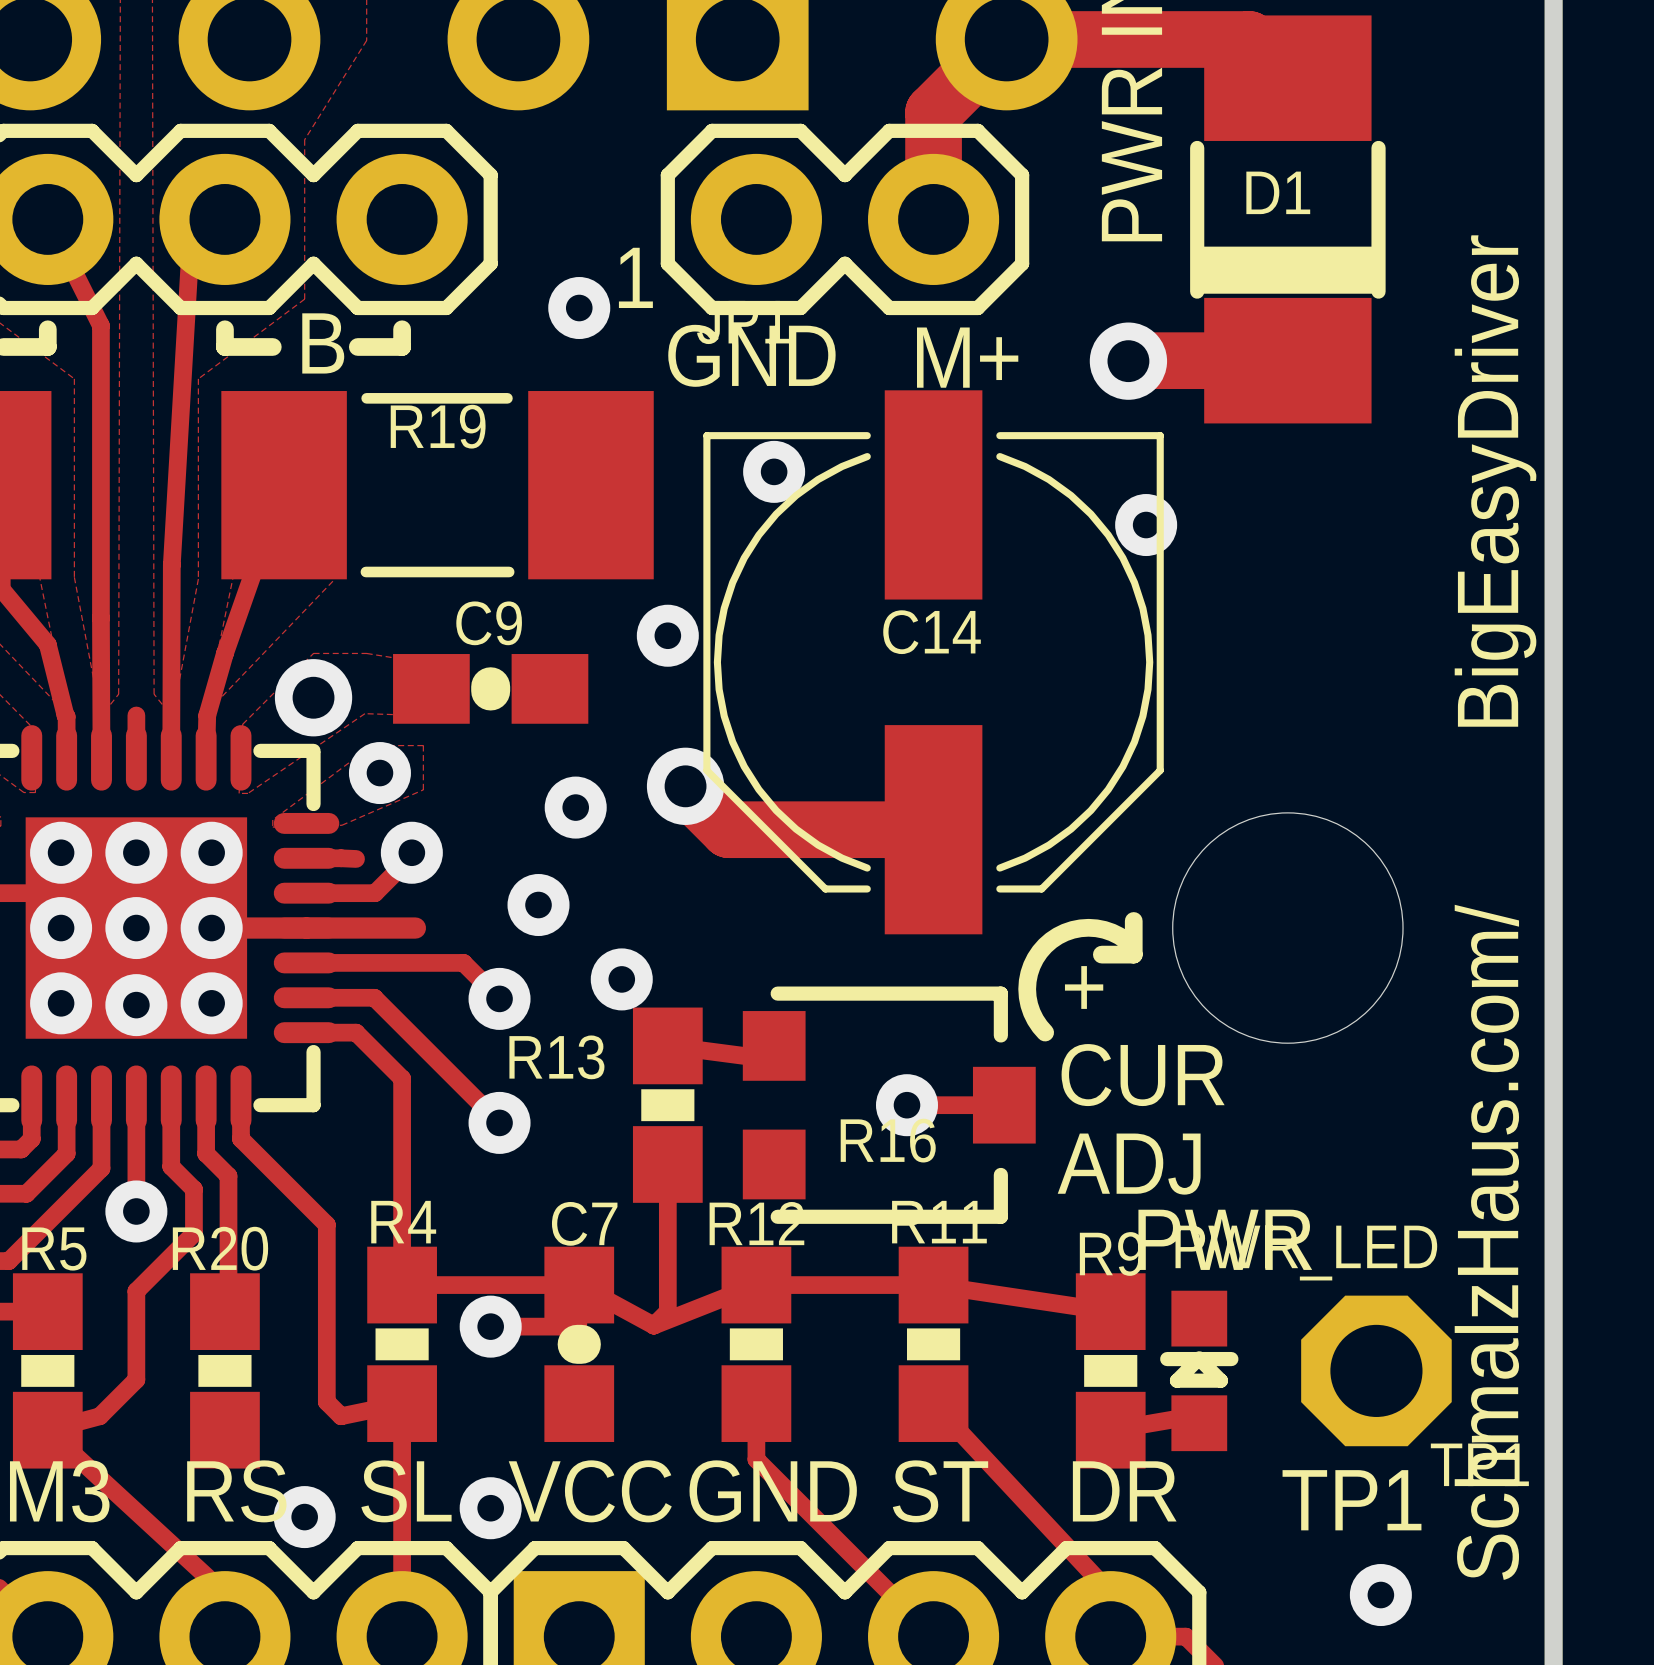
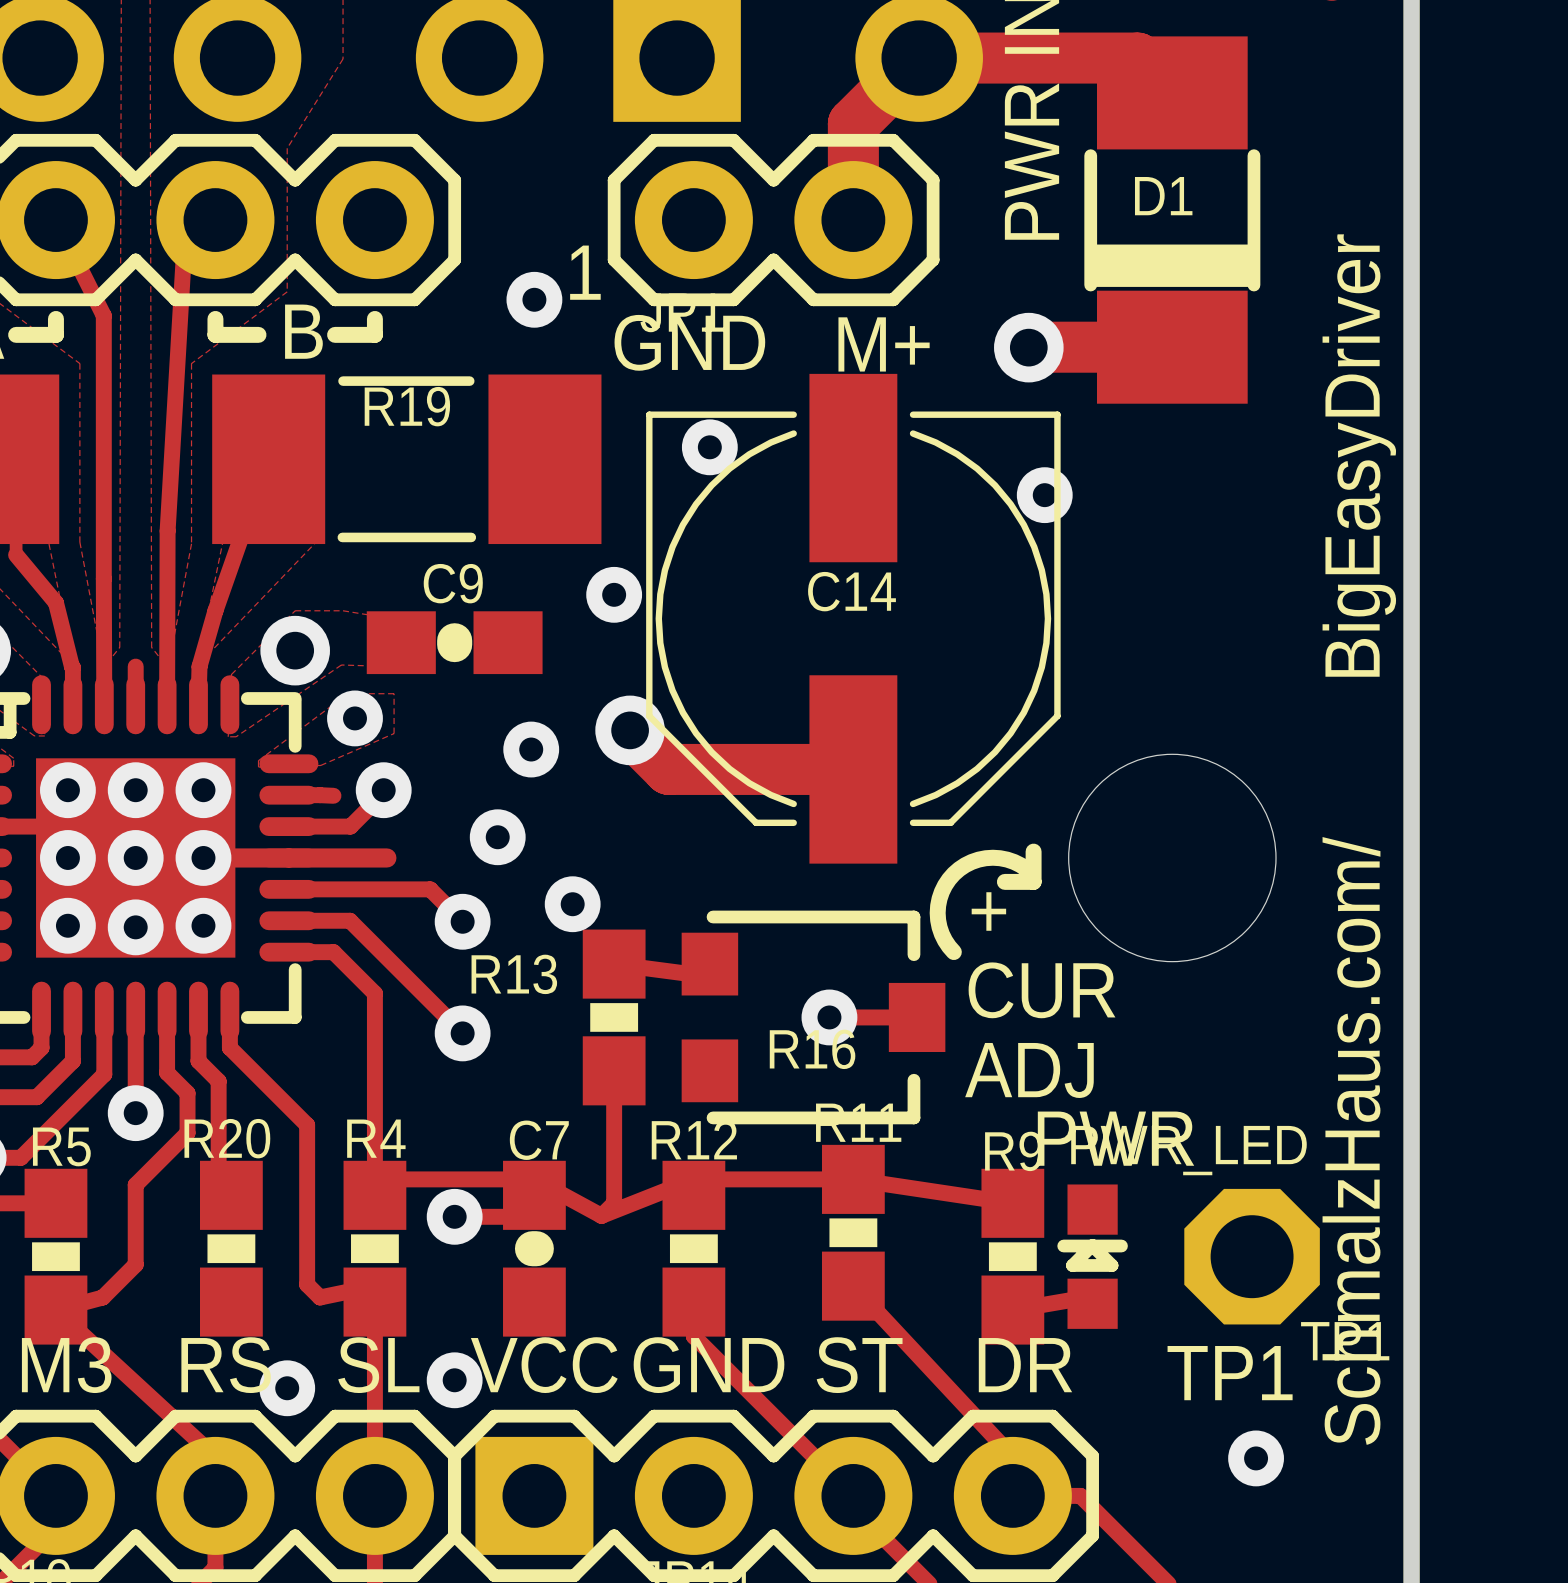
R4 position: (402, 1344) -> (374, 1248)
C7 position: (579, 1344) -> (534, 1248)
R12 position: (756, 1344) -> (693, 1248)
R20 position: (224, 1370) -> (231, 1248)

